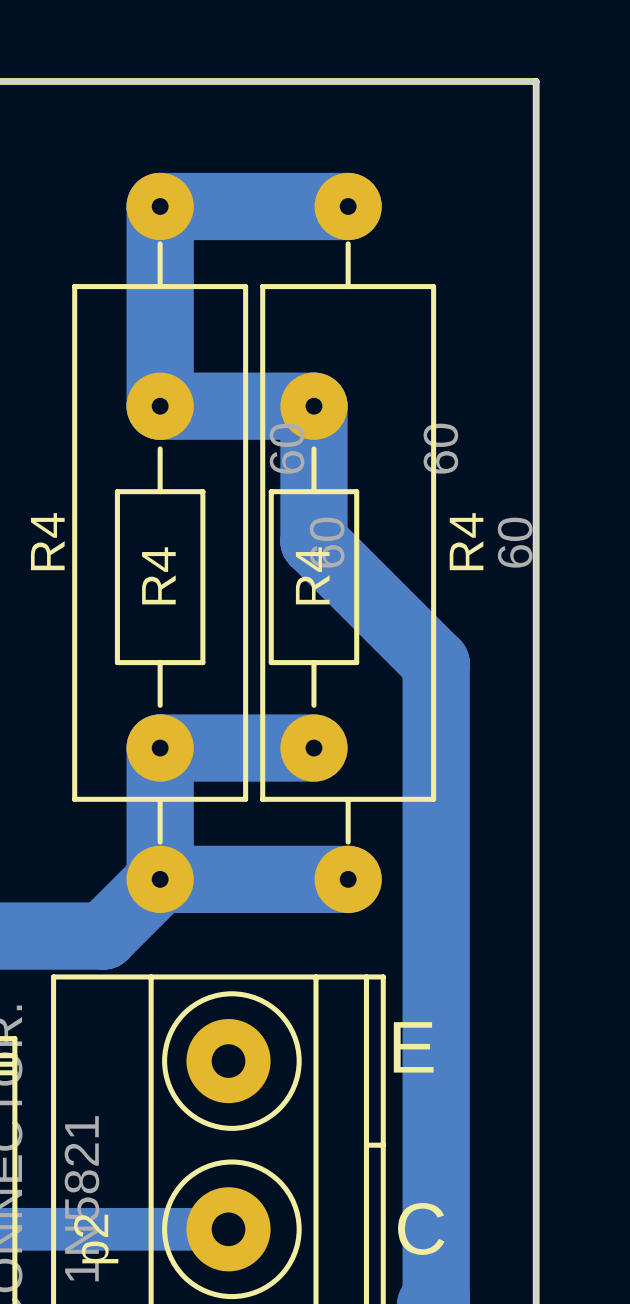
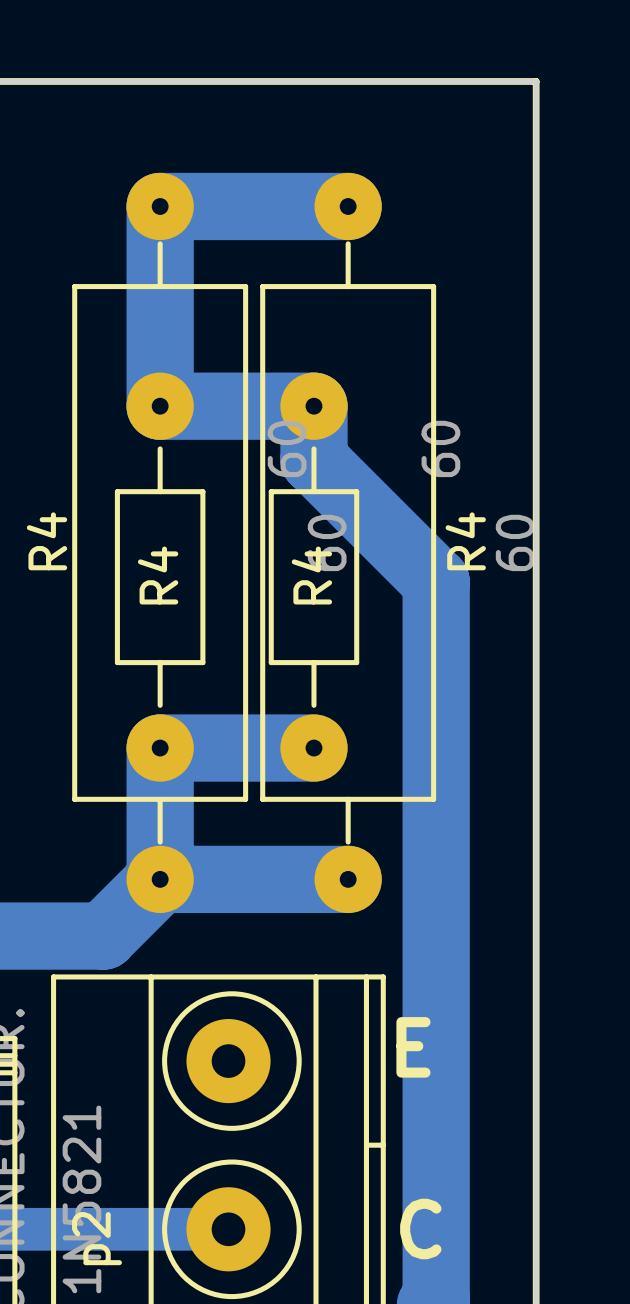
bottom track: (313, 459) (313, 541) (436, 663) -> (313, 459) (436, 581) (436, 663)

